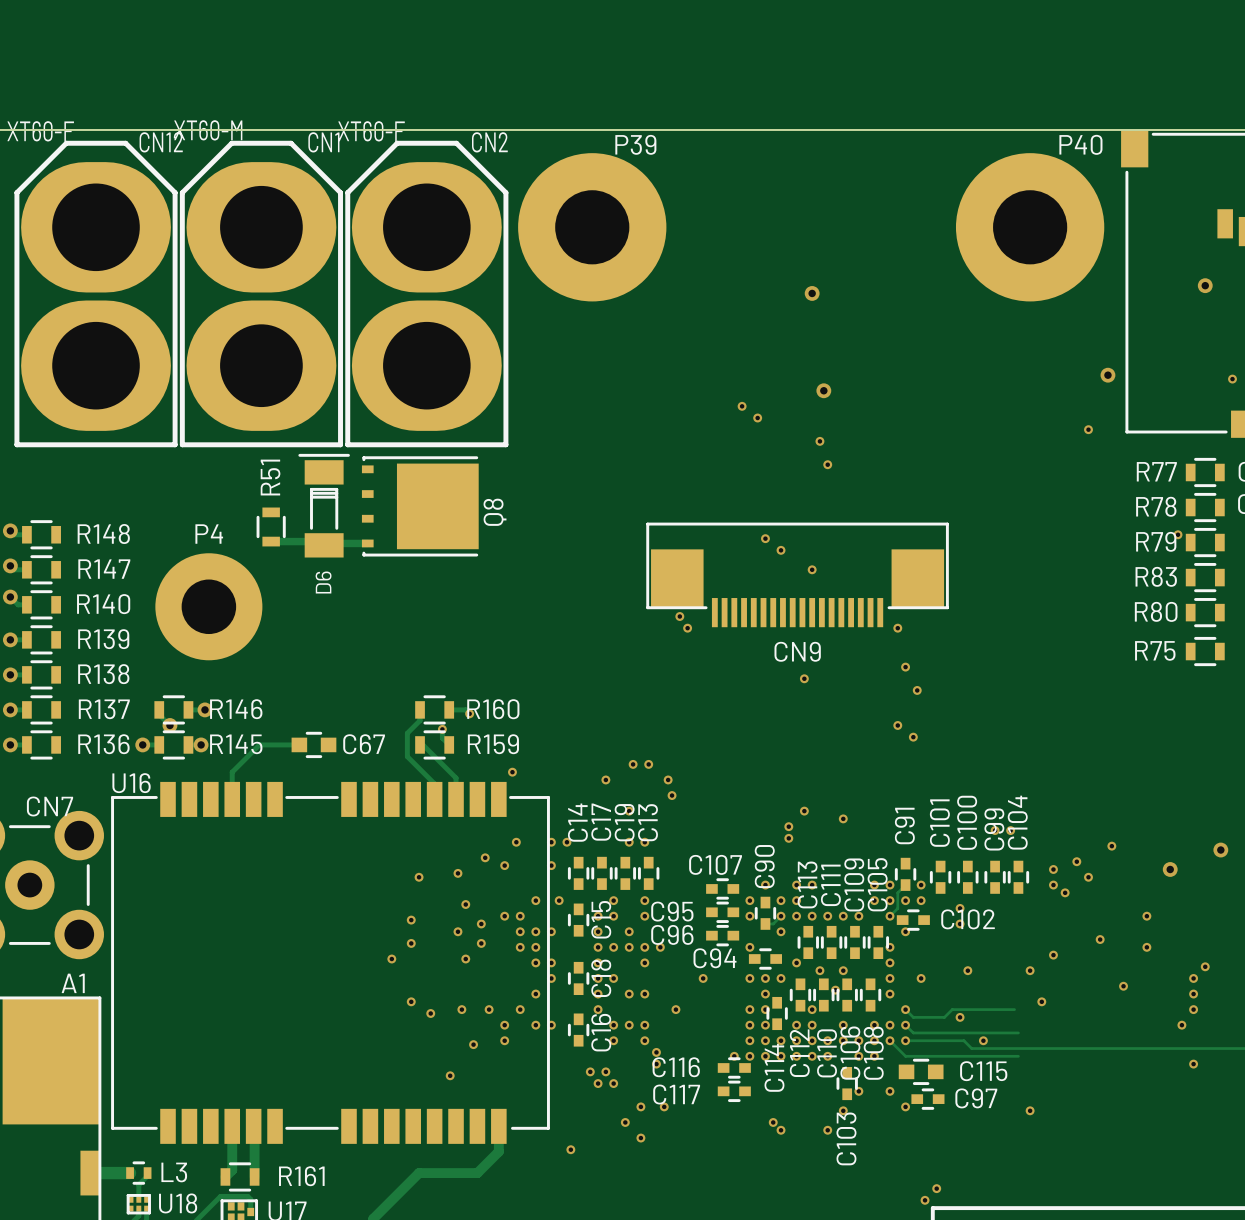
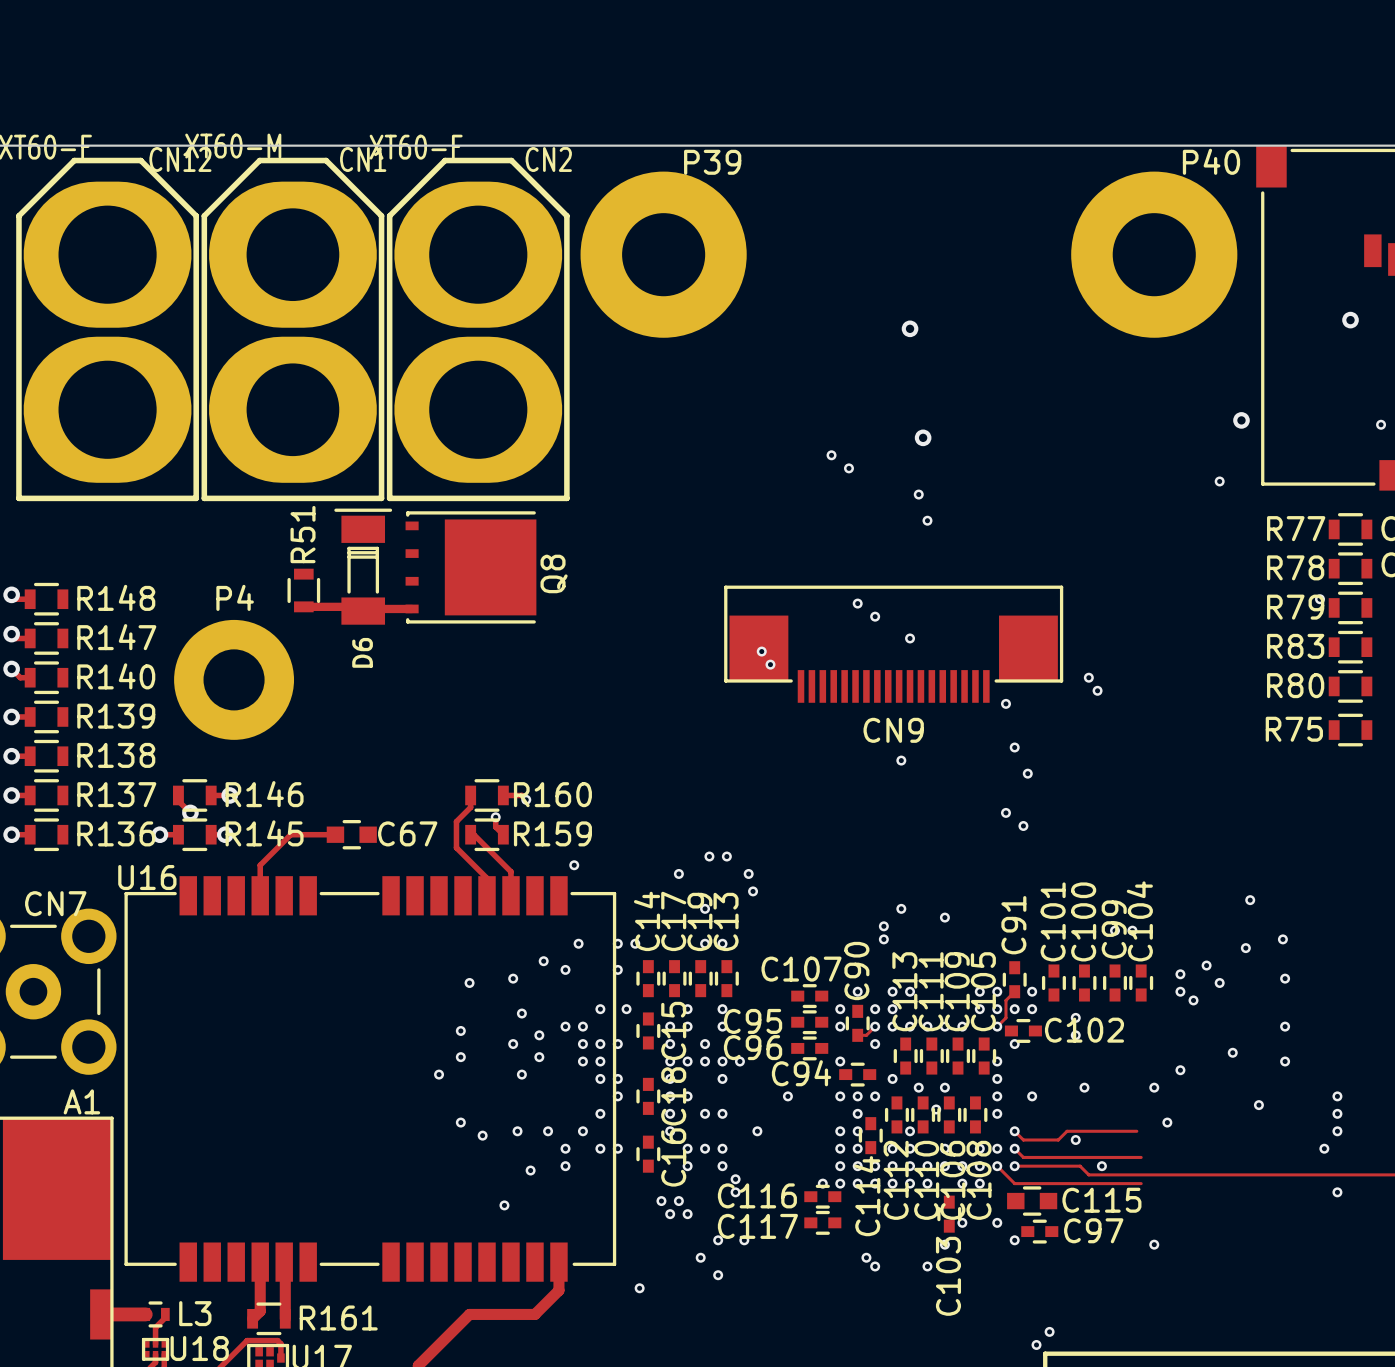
via: none -> (761, 651)
via: none -> (770, 664)
via: none -> (1088, 677)
via: (679, 616) -> none
via: none -> (1097, 690)
via: (687, 628) -> none
via: none -> (1250, 900)
via: none -> (1282, 939)
via: (1220, 850) -> none
via: (1170, 869) -> none
via: none -> (1285, 978)
via: (1205, 966) -> none

